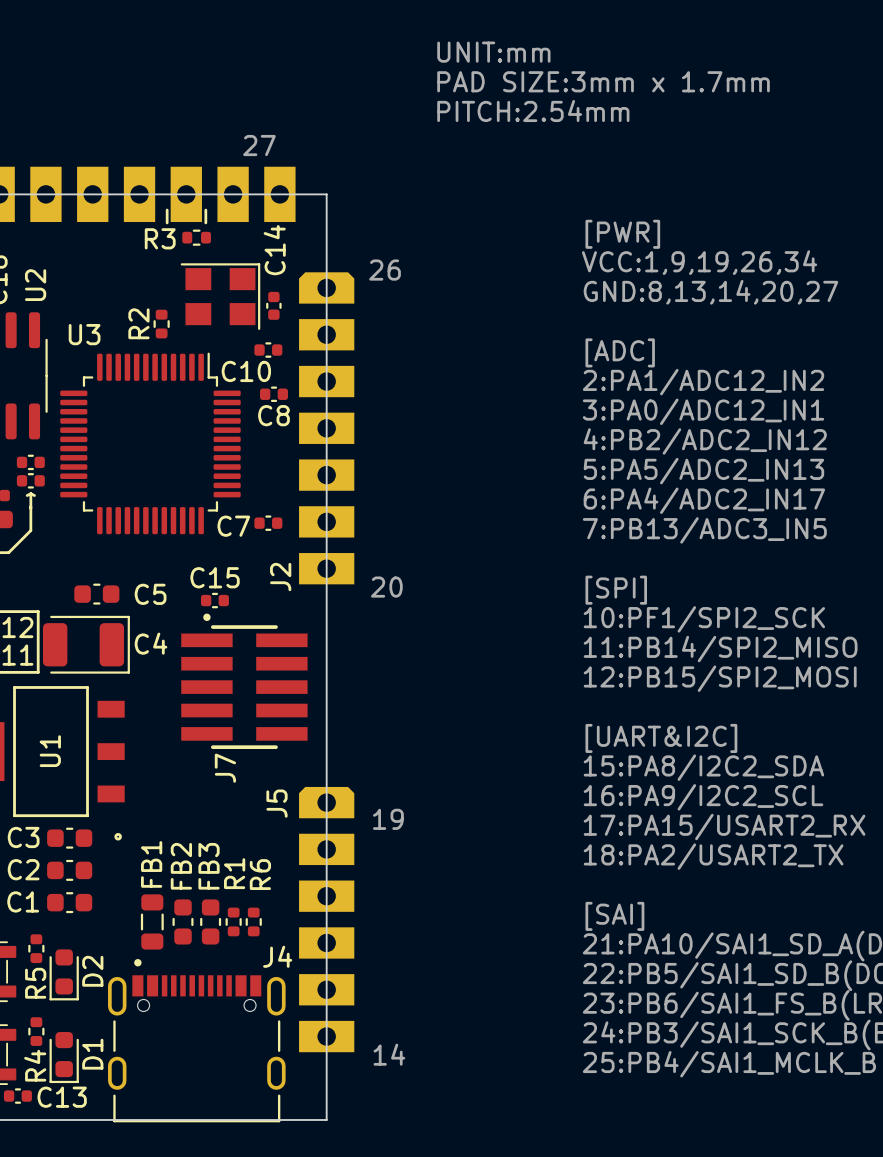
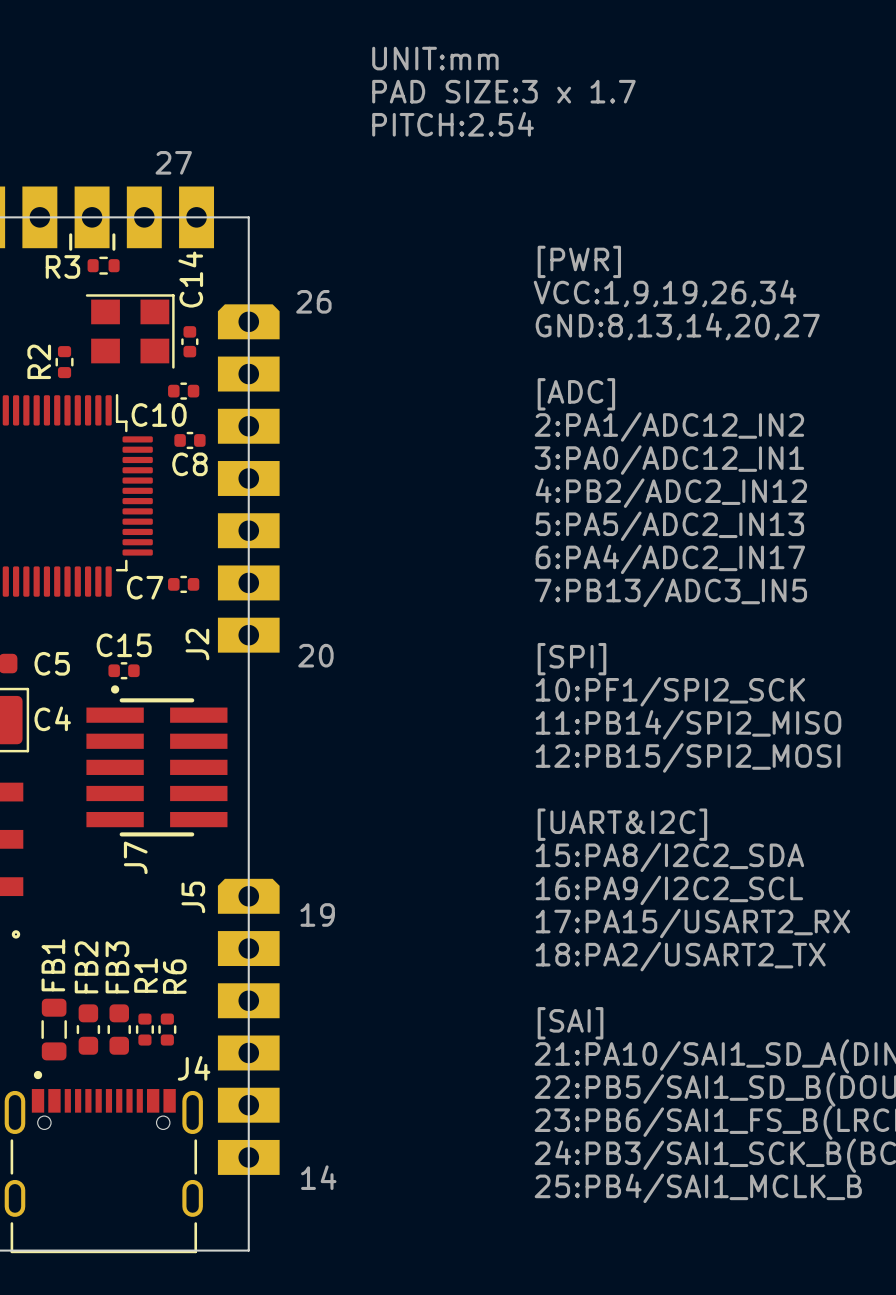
text: PAD SIZE:3mm x 1.7mm (603, 81) -> PAD SIZE:3 x 1.7 (503, 91)
text: PITCH:2.54mm (533, 111) -> PITCH:2.54 (453, 124)

